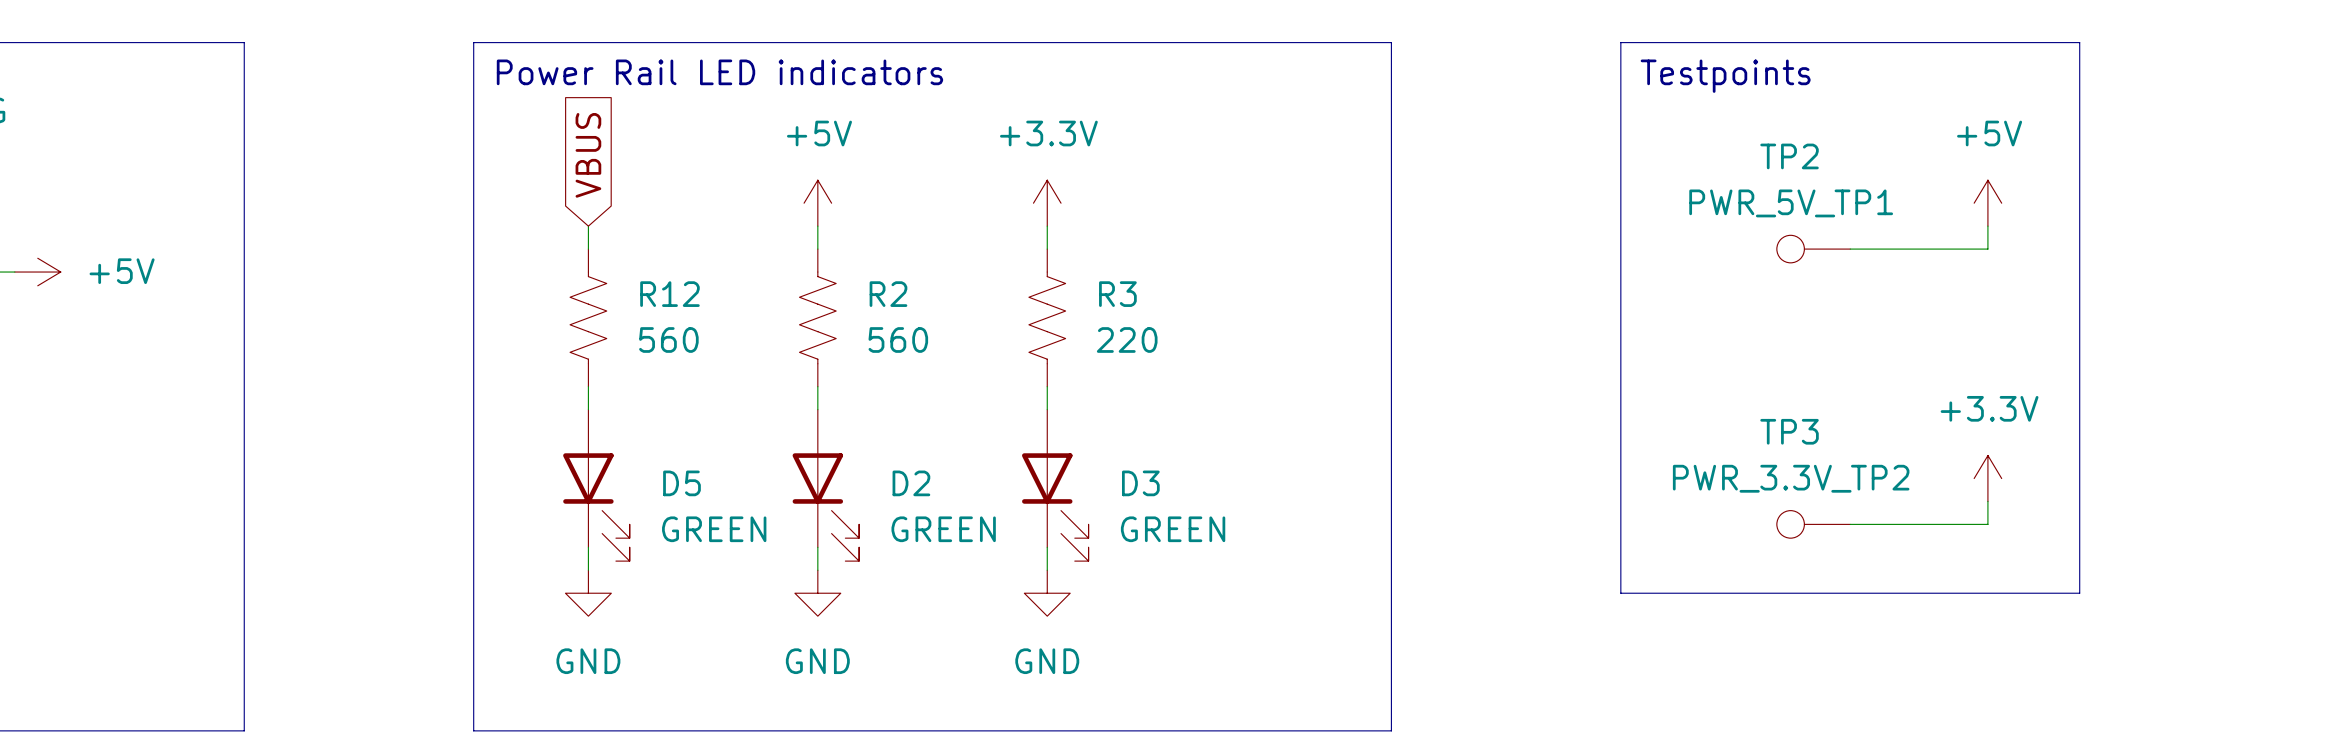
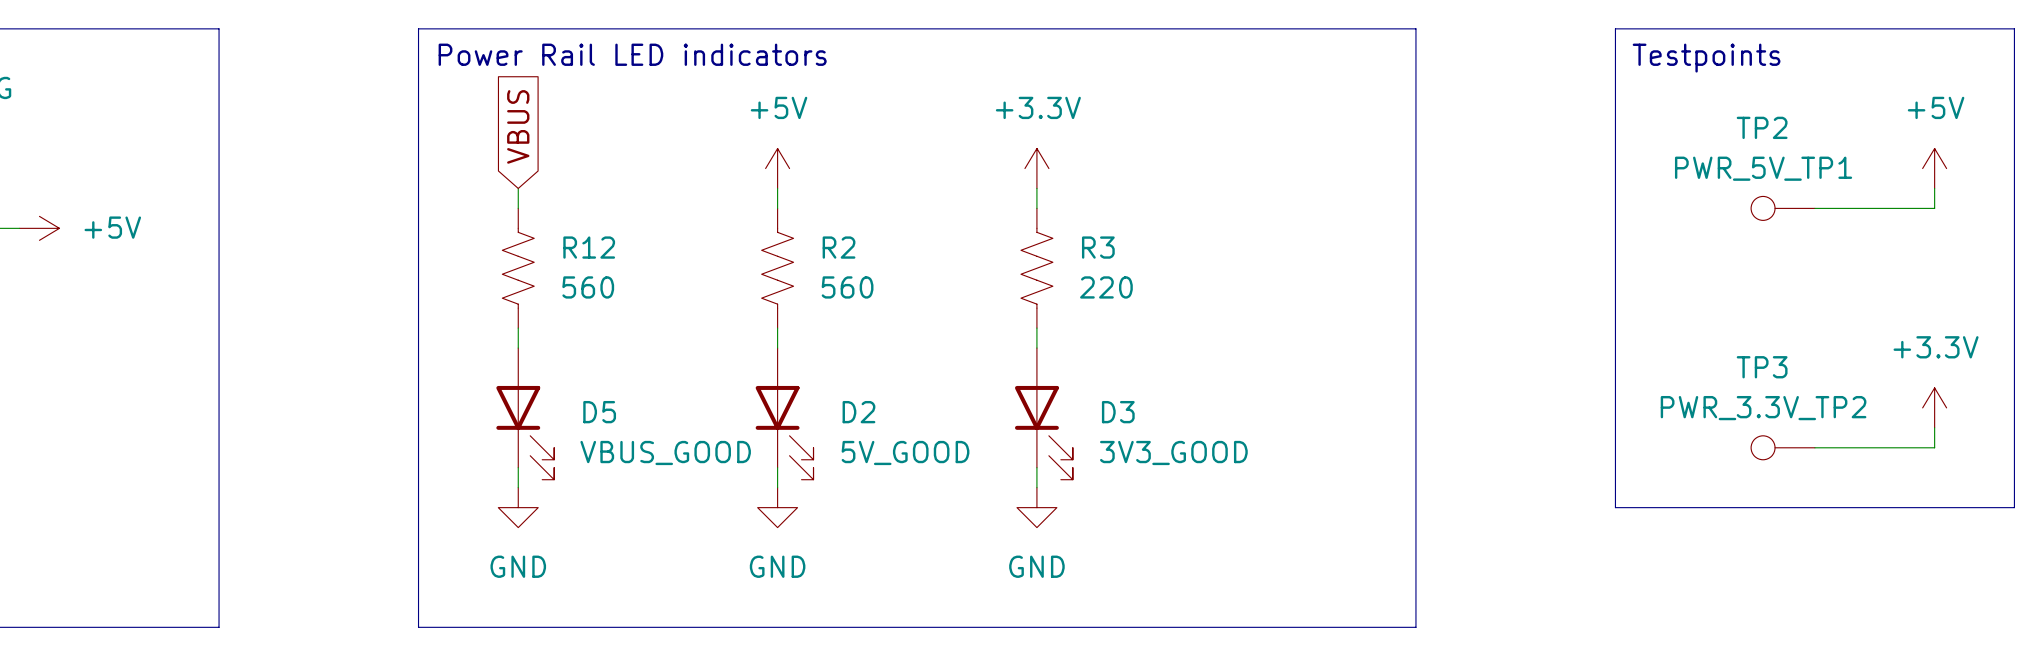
line: (1391, 42) (1391, 730) -> none
line: (1620, 42) (1850, 42) -> (1415, 28) (1216, 28)
line: none -> (1615, 28) (1615, 507)
line: (2079, 42) (2079, 593) -> (1814, 28) (2014, 28) (2014, 507) (1814, 507)
text position: Testpoints (1725, 76) -> Testpoints (1706, 58)
power symbol position: +5V (817, 203) -> +5V (777, 168)
power symbol position: +3.3V (1047, 203) -> +3.3V (1036, 168)
power symbol position: +5V (1987, 203) -> +5V (1934, 168)
wire: (817, 226) (817, 249) -> (777, 188) (777, 208)
wire: (1047, 226) (1047, 249) -> (1036, 188) (1036, 208)
wire: (1987, 226) (1987, 249) (1850, 249) -> (1934, 188) (1934, 208) (1814, 208)
TP2 position: (1813, 249) -> (1783, 208)
R2 position: (817, 317) -> (777, 268)
R3 position: (1047, 317) -> (1036, 268)
wire: (817, 386) (817, 409) -> (777, 328) (777, 348)
wire: (1047, 386) (1047, 409) -> (1036, 328) (1036, 348)
power symbol position: +3.3V (1987, 478) -> +3.3V (1934, 407)
D2 position: (825, 485) -> (784, 413)
D3 position: (1055, 485) -> (1043, 413)
wire: (1987, 501) (1987, 524) (1850, 524) -> (1934, 427) (1934, 447) (1814, 447)
TP3 position: (1813, 524) -> (1783, 447)
D5 value: GREEN (714, 529) -> VBUS_GOOD (665, 452)
D2 value: GREEN (943, 529) -> 5V_GOOD (905, 452)
D3 value: GREEN (1173, 529) -> 3V3_GOOD (1173, 452)
wire: (817, 547) (817, 570) -> (777, 467) (777, 487)
wire: (1047, 547) (1047, 570) -> (1036, 467) (1036, 487)
power symbol position: GND (817, 593) -> GND (777, 507)
power symbol: GND (1047, 593) -> none
power symbol: none -> GND (1036, 507)
line: (1620, 593) (1850, 593) -> (1415, 507) (1415, 627) (1216, 627)

